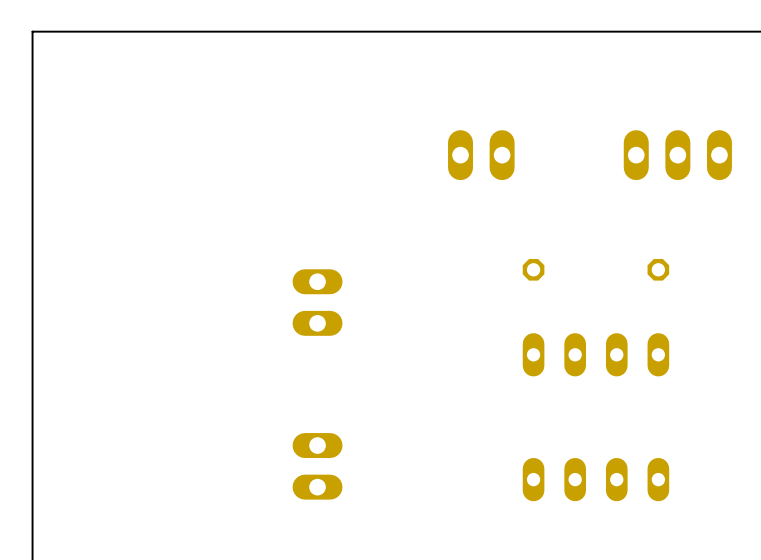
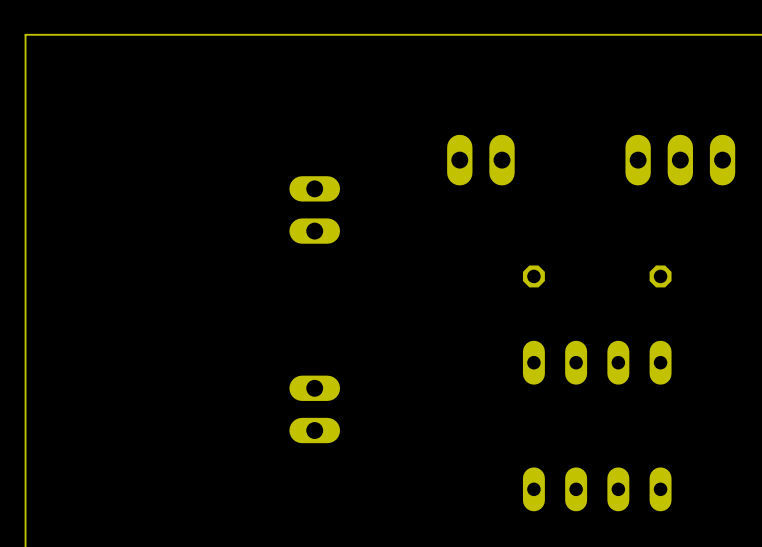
part: none -> (314, 209)
part: (317, 302) -> none
part: none -> (314, 409)
part: (317, 466) -> none

